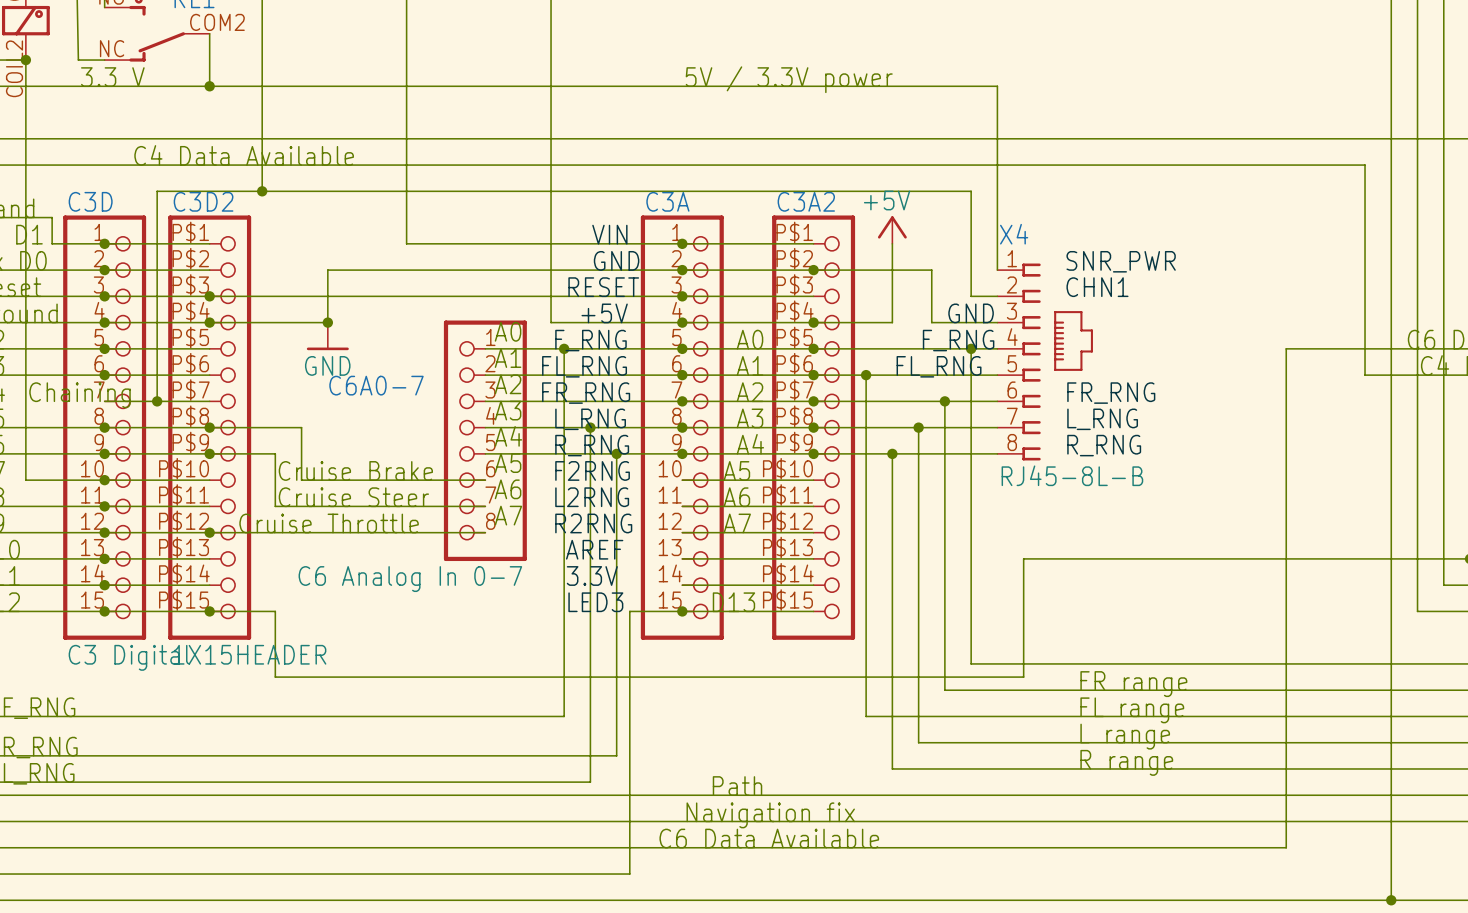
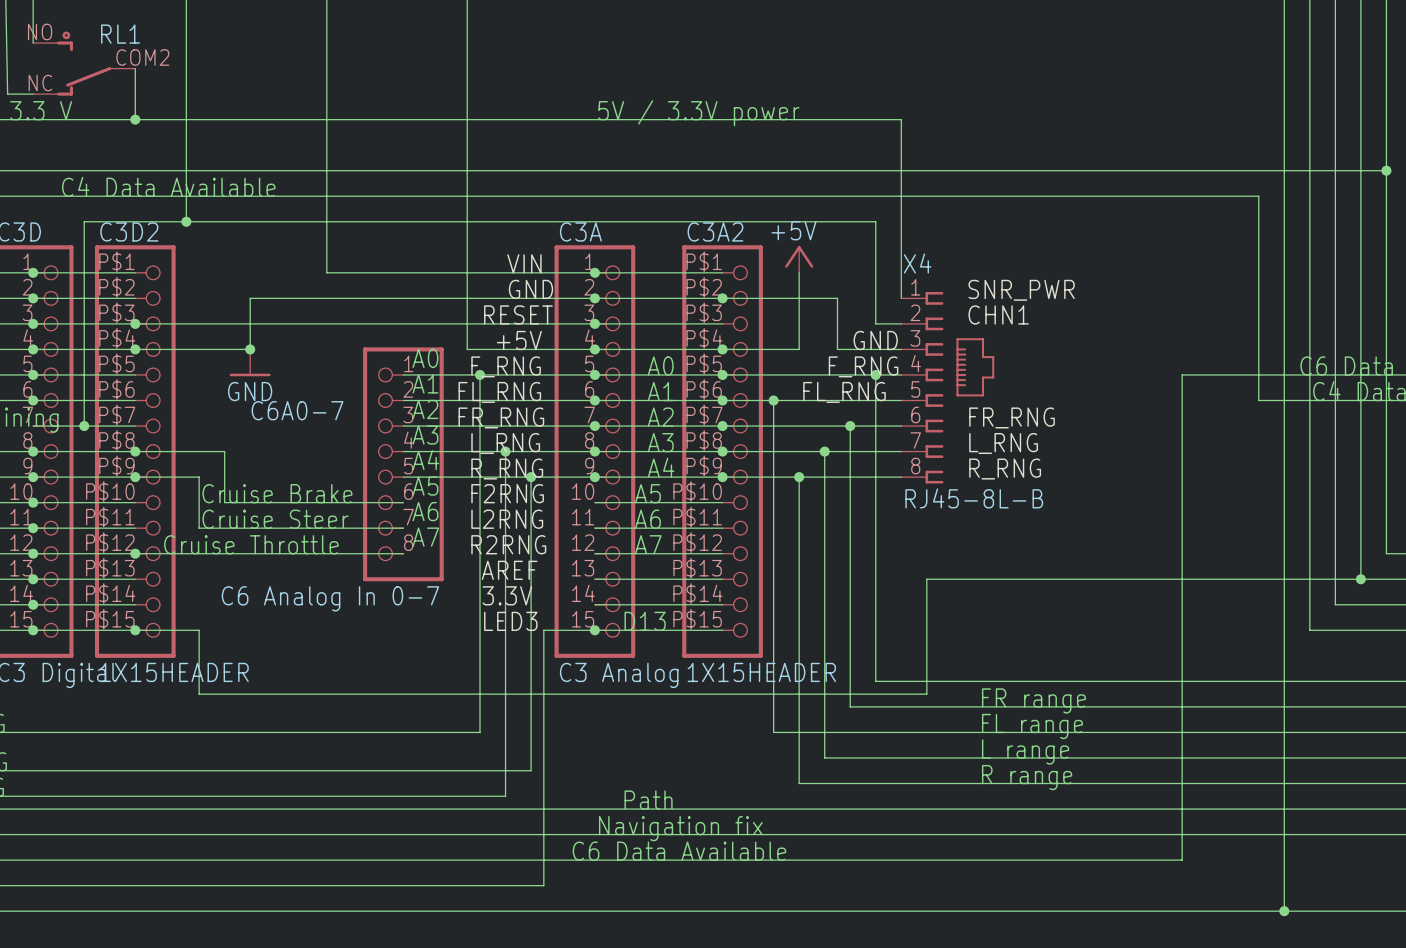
C3A2 value: none -> 1X15HEADER (761, 672)
C3A value: none -> C3 Analog (619, 675)

